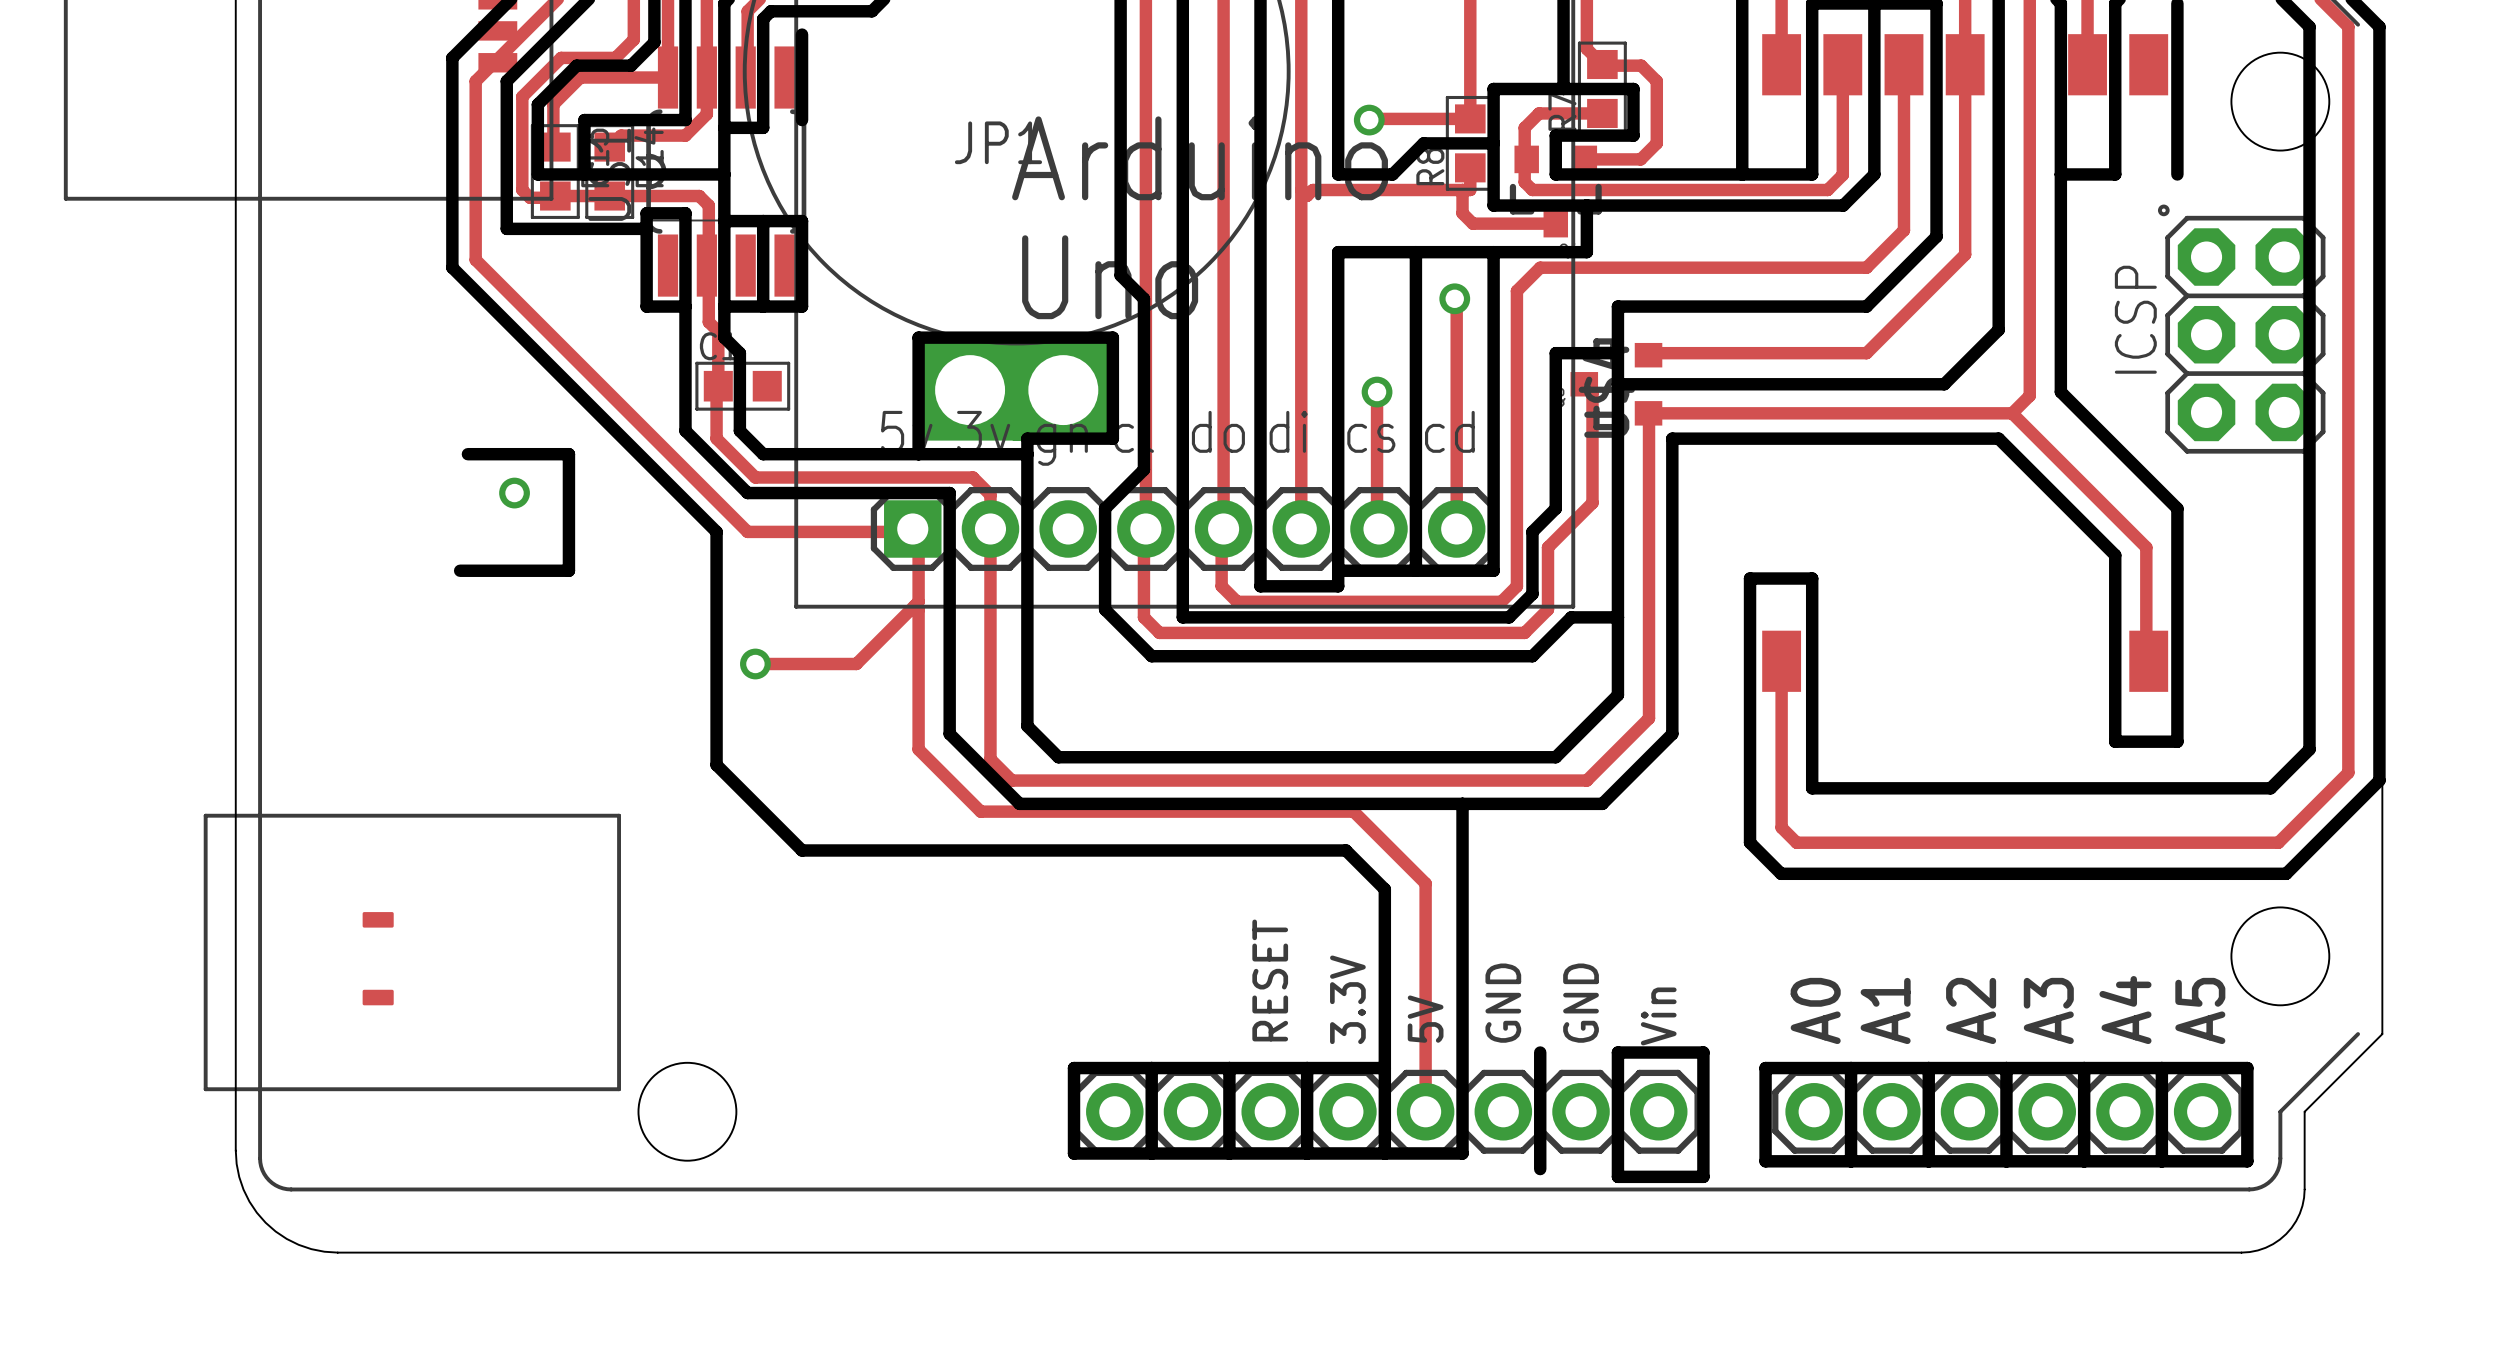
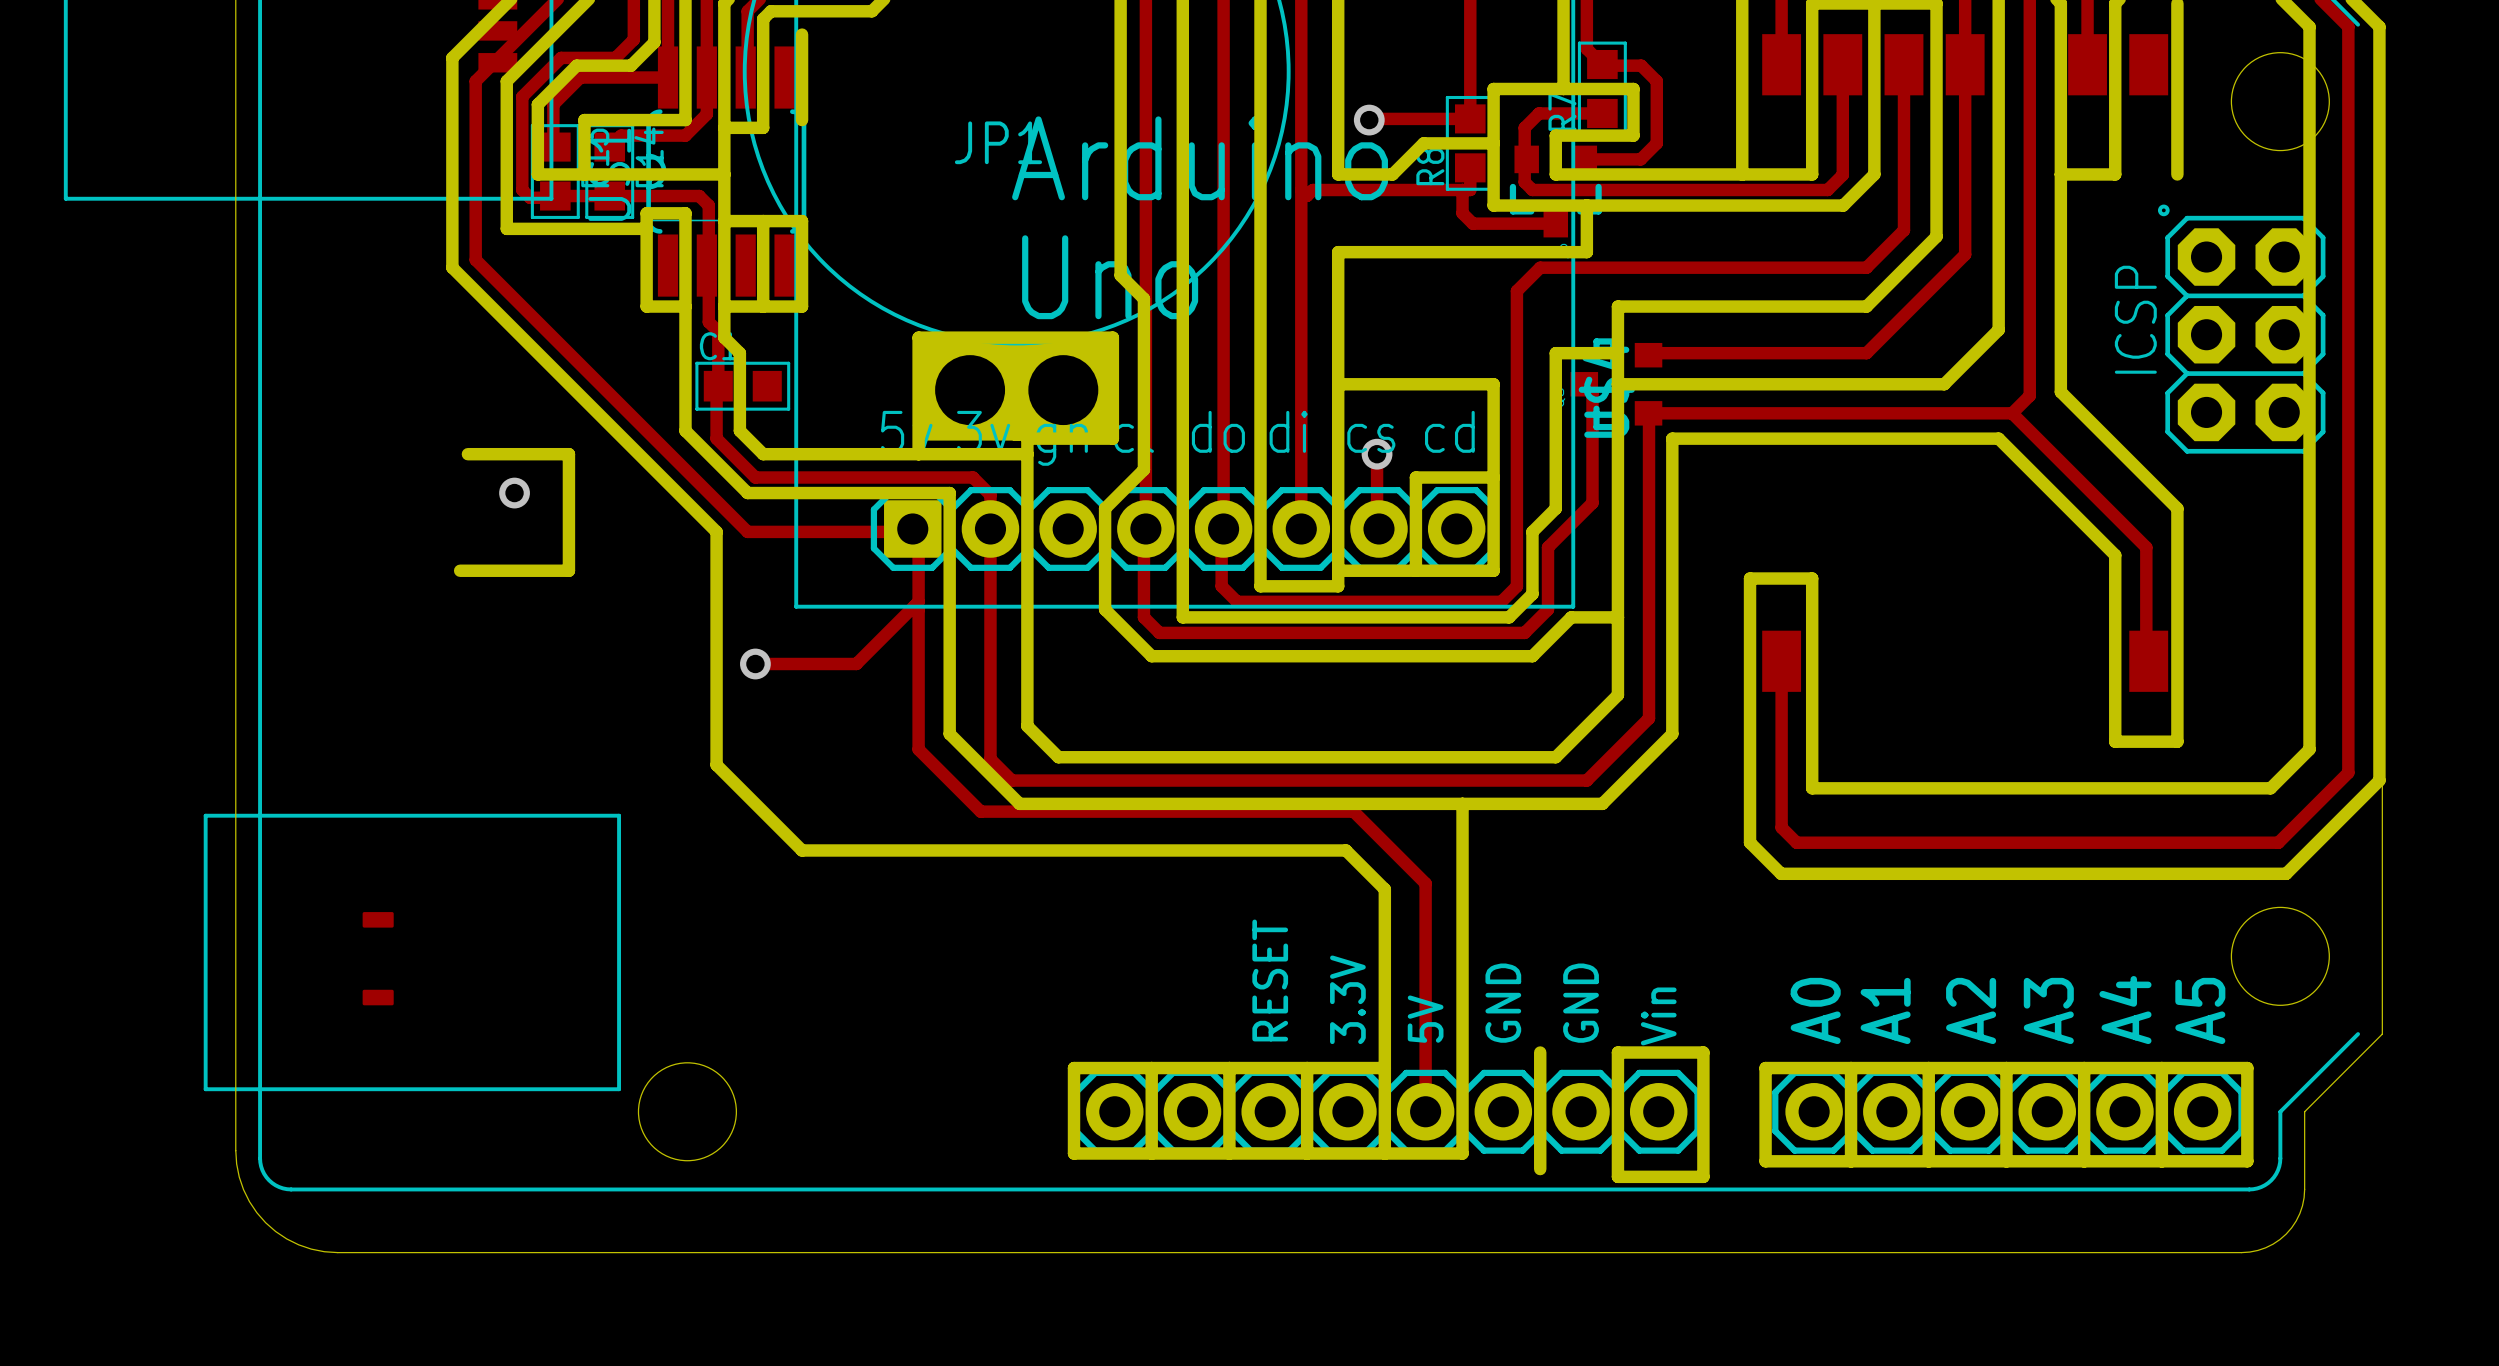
board edge: (1415, 252) (1415, 477) -> (1493, 477) (1415, 477)
board edge: (1493, 252) (1493, 384) -> (1338, 384) (1493, 384)
track: (1454, 298) (1456, 300) (1456, 528) -> none
via: (1454, 298) -> none
track: (1377, 392) (1377, 454) -> none
via position: (1377, 392) -> (1377, 454)

